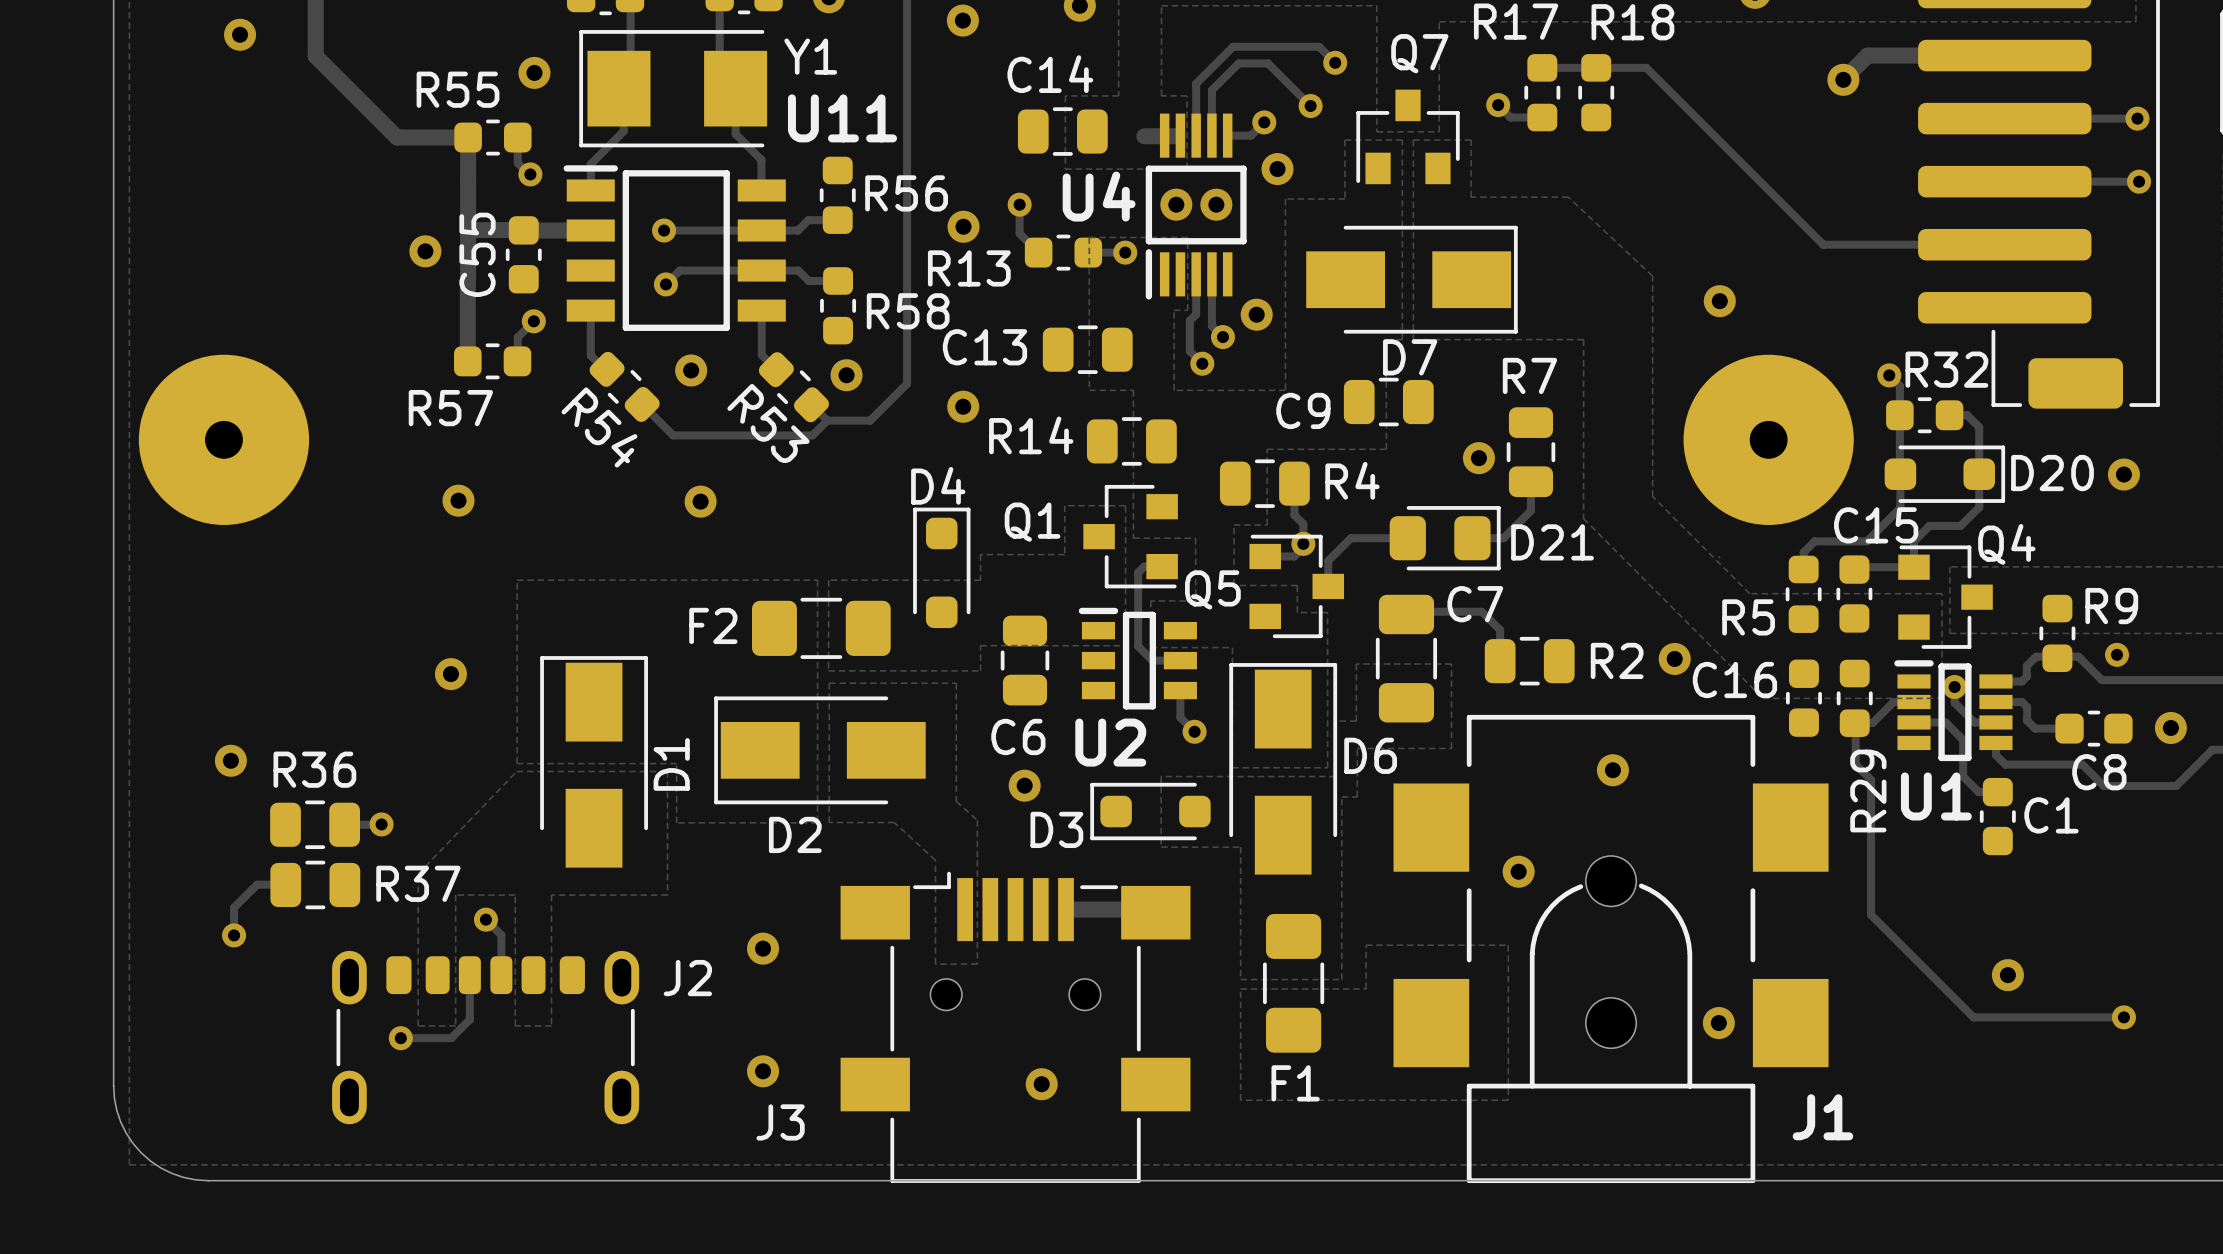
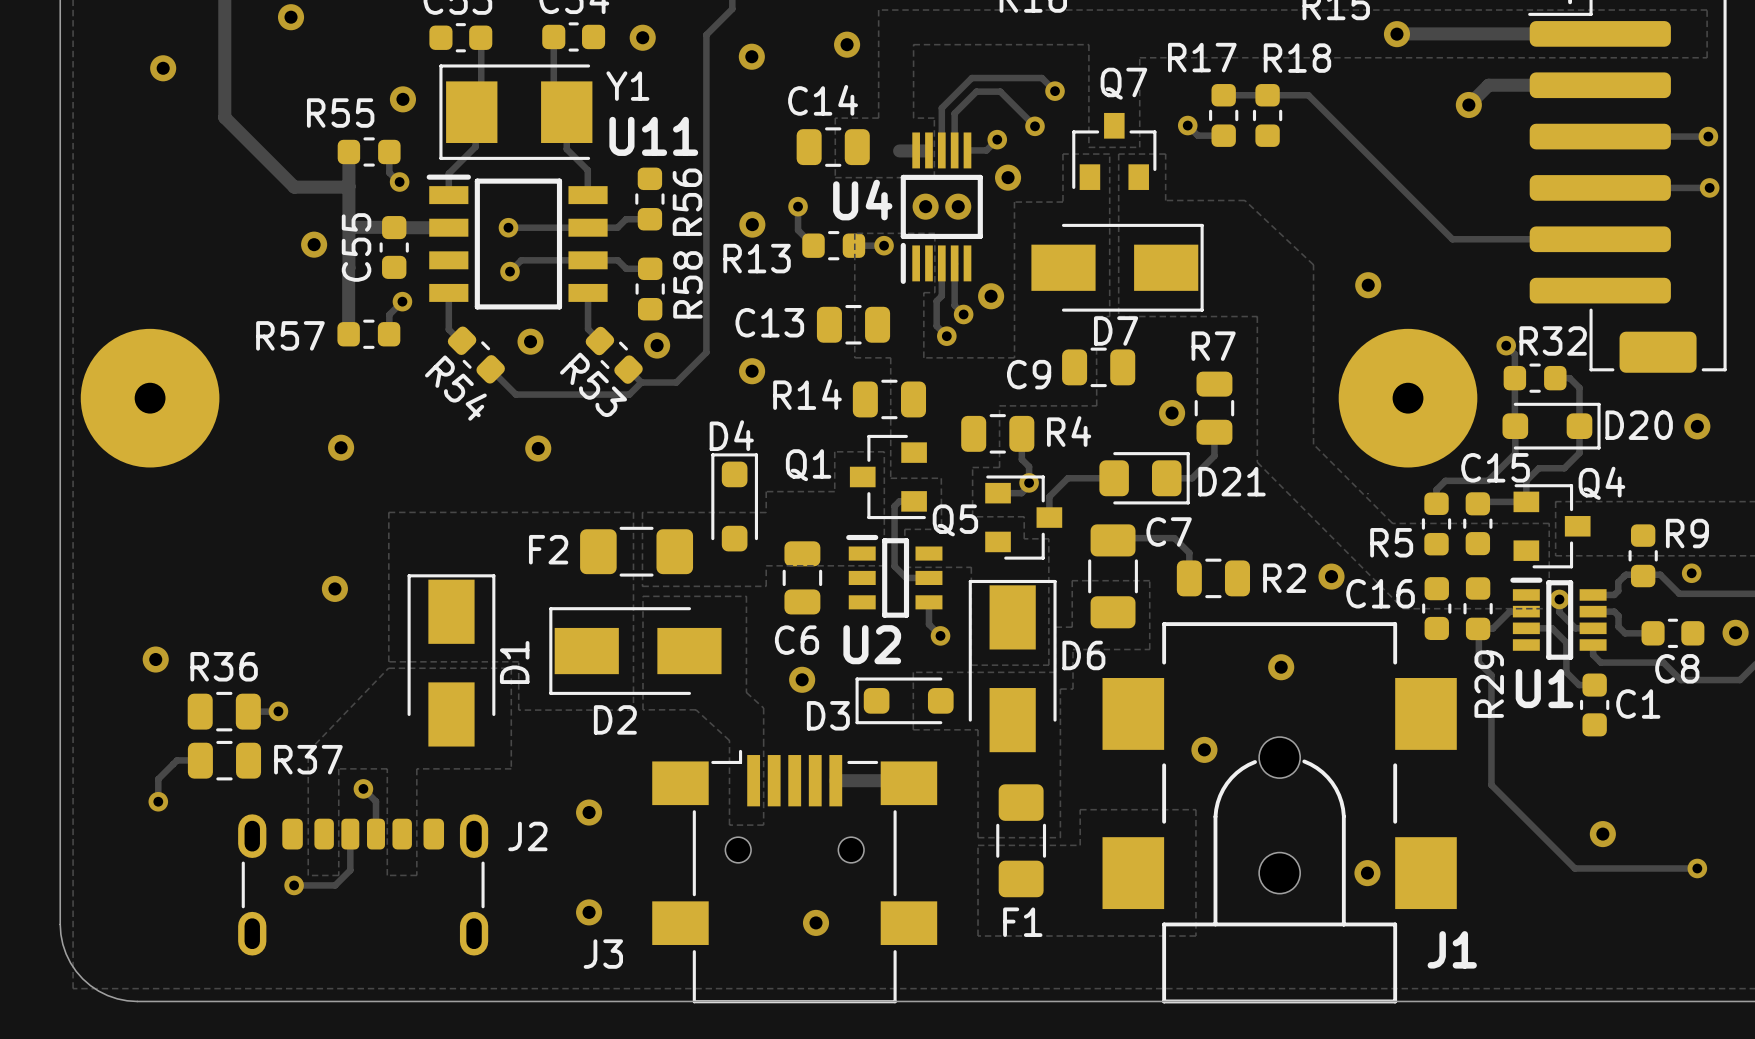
track: (315, 56) (397, 137) (468, 137) -> (224, 85) (224, 117) (294, 187) (348, 186)
R56 name rotation: 0° (906, 193) -> 90° counterclockwise (687, 202)
R58 name rotation: 0° (908, 311) -> 90° counterclockwise (687, 284)
R57 name position: R57 (450, 408) -> R57 (290, 335)

